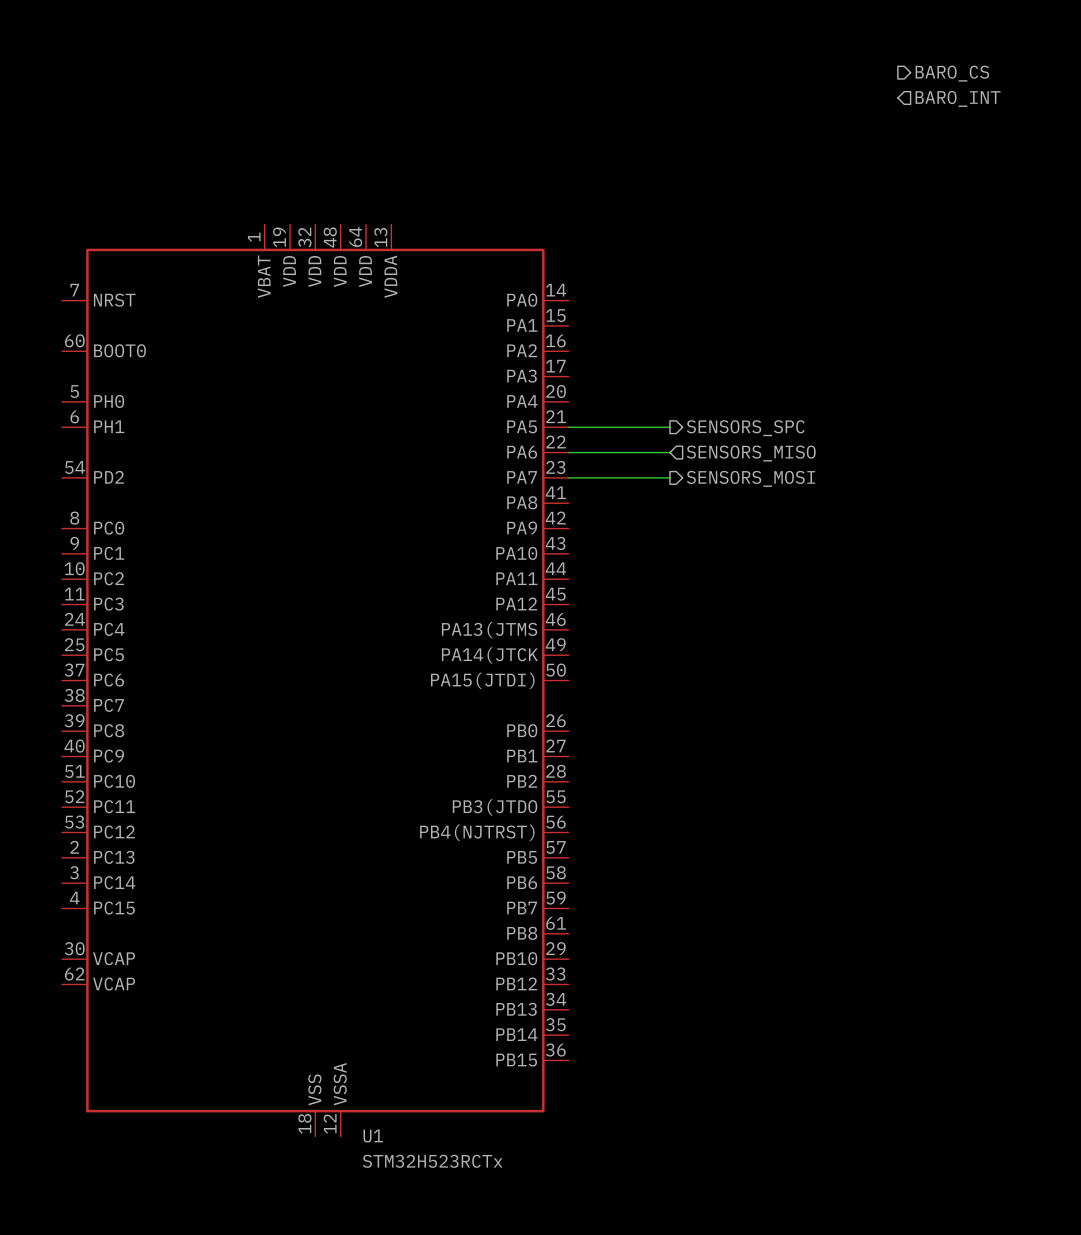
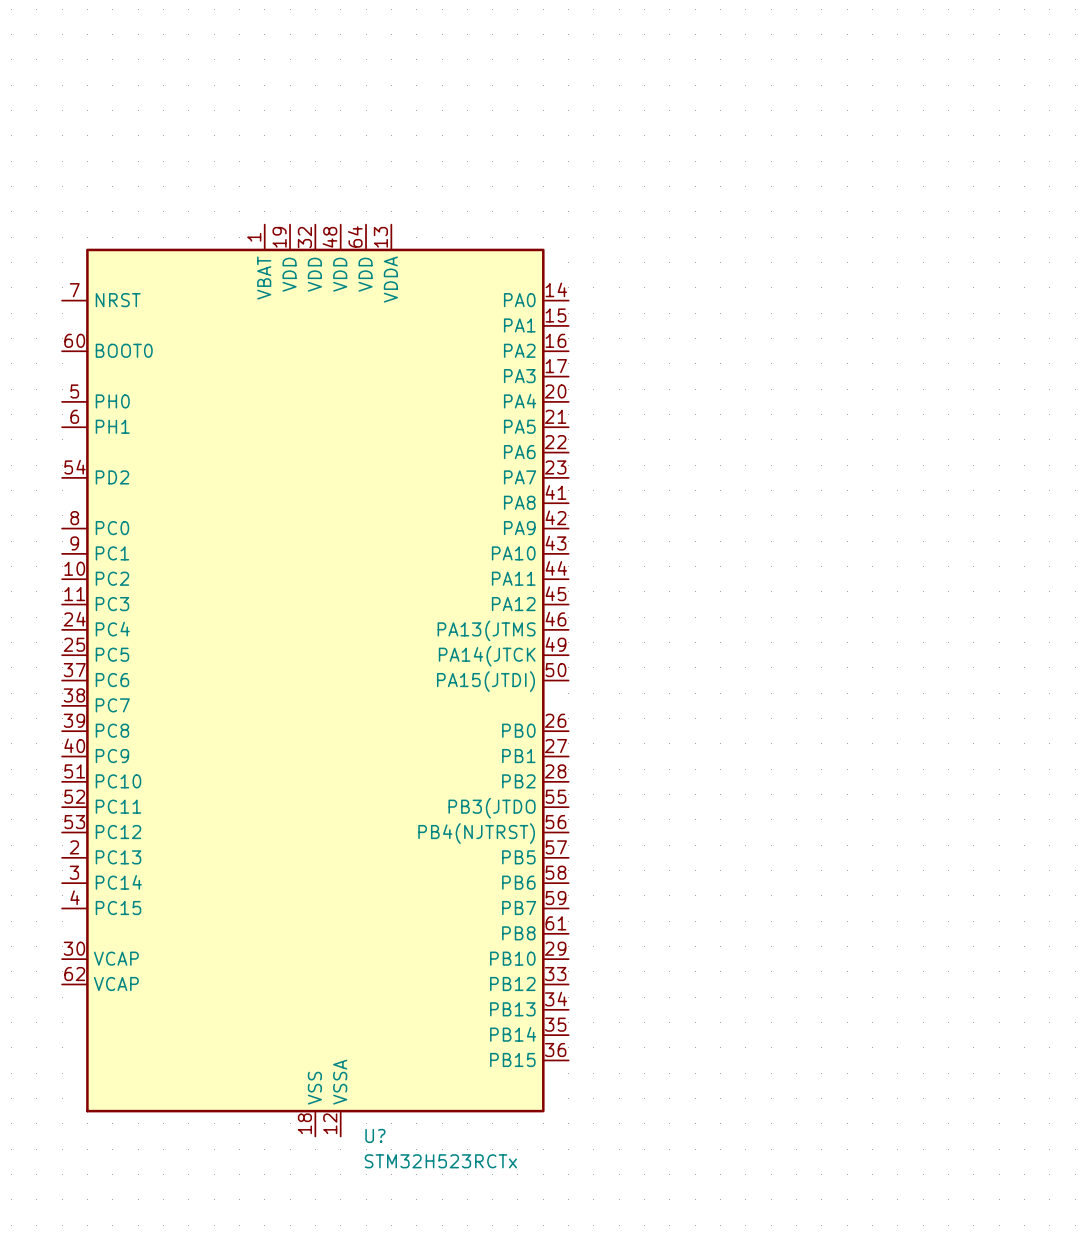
hierarchical label: BARO_CS (952, 73) -> none
hierarchical label: BARO_INT (958, 98) -> none
wire: (568, 427) (669, 427) -> none
hierarchical label: SENSORS_SPC (745, 428) -> none
wire: (568, 452) (669, 452) -> none
hierarchical label: SENSORS_MISO (751, 453) -> none
wire: (568, 477) (669, 477) -> none
hierarchical label: SENSORS_MOSI (751, 478) -> none
U1 name: U1 (373, 1136) -> U? (375, 1135)

